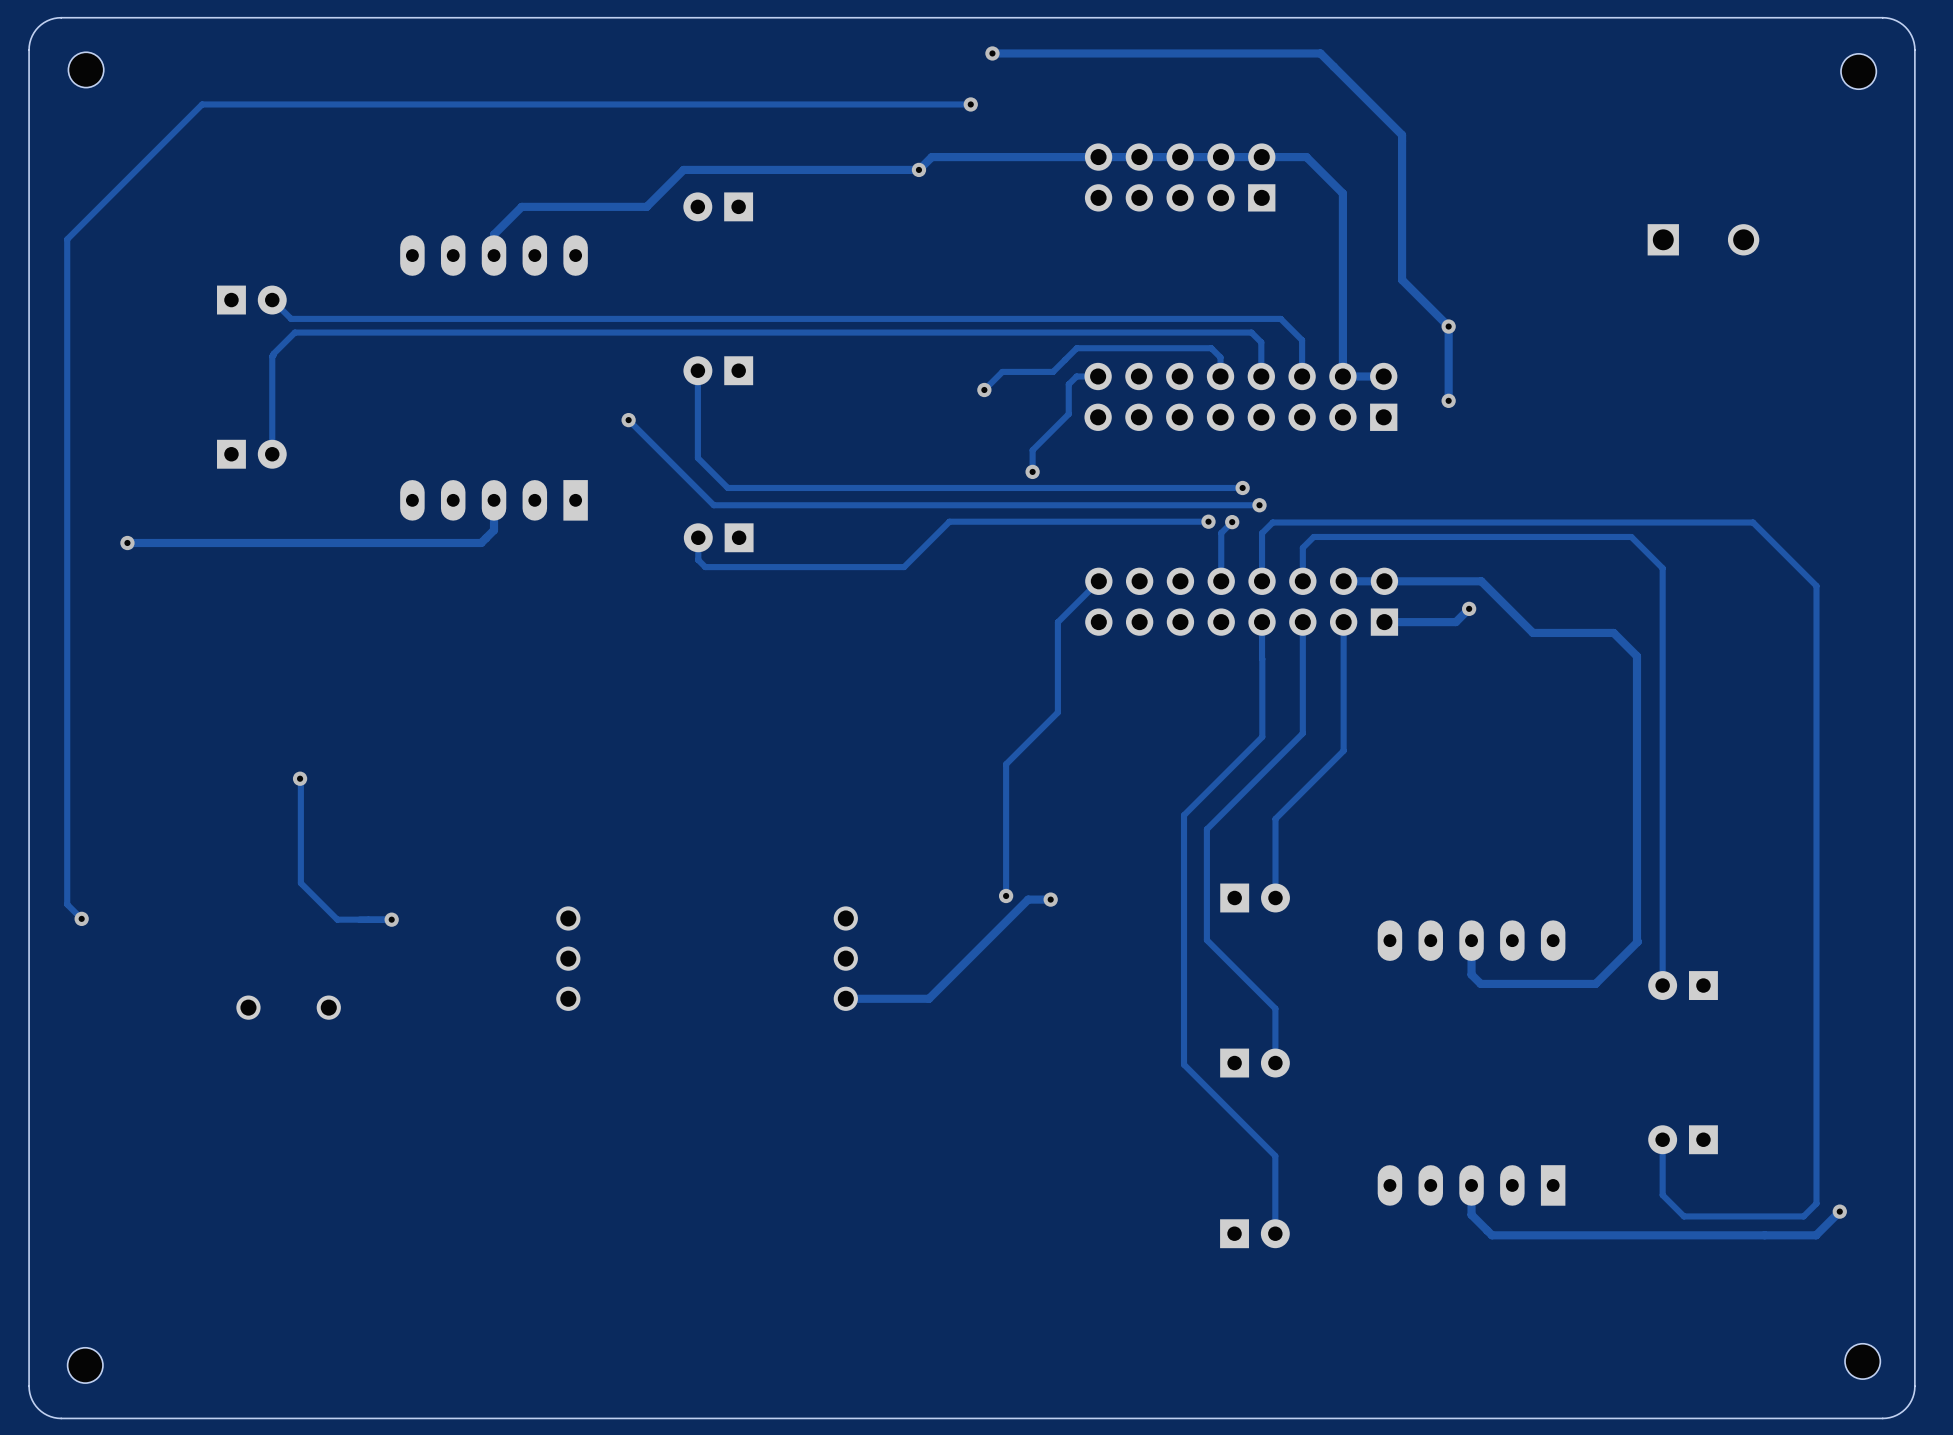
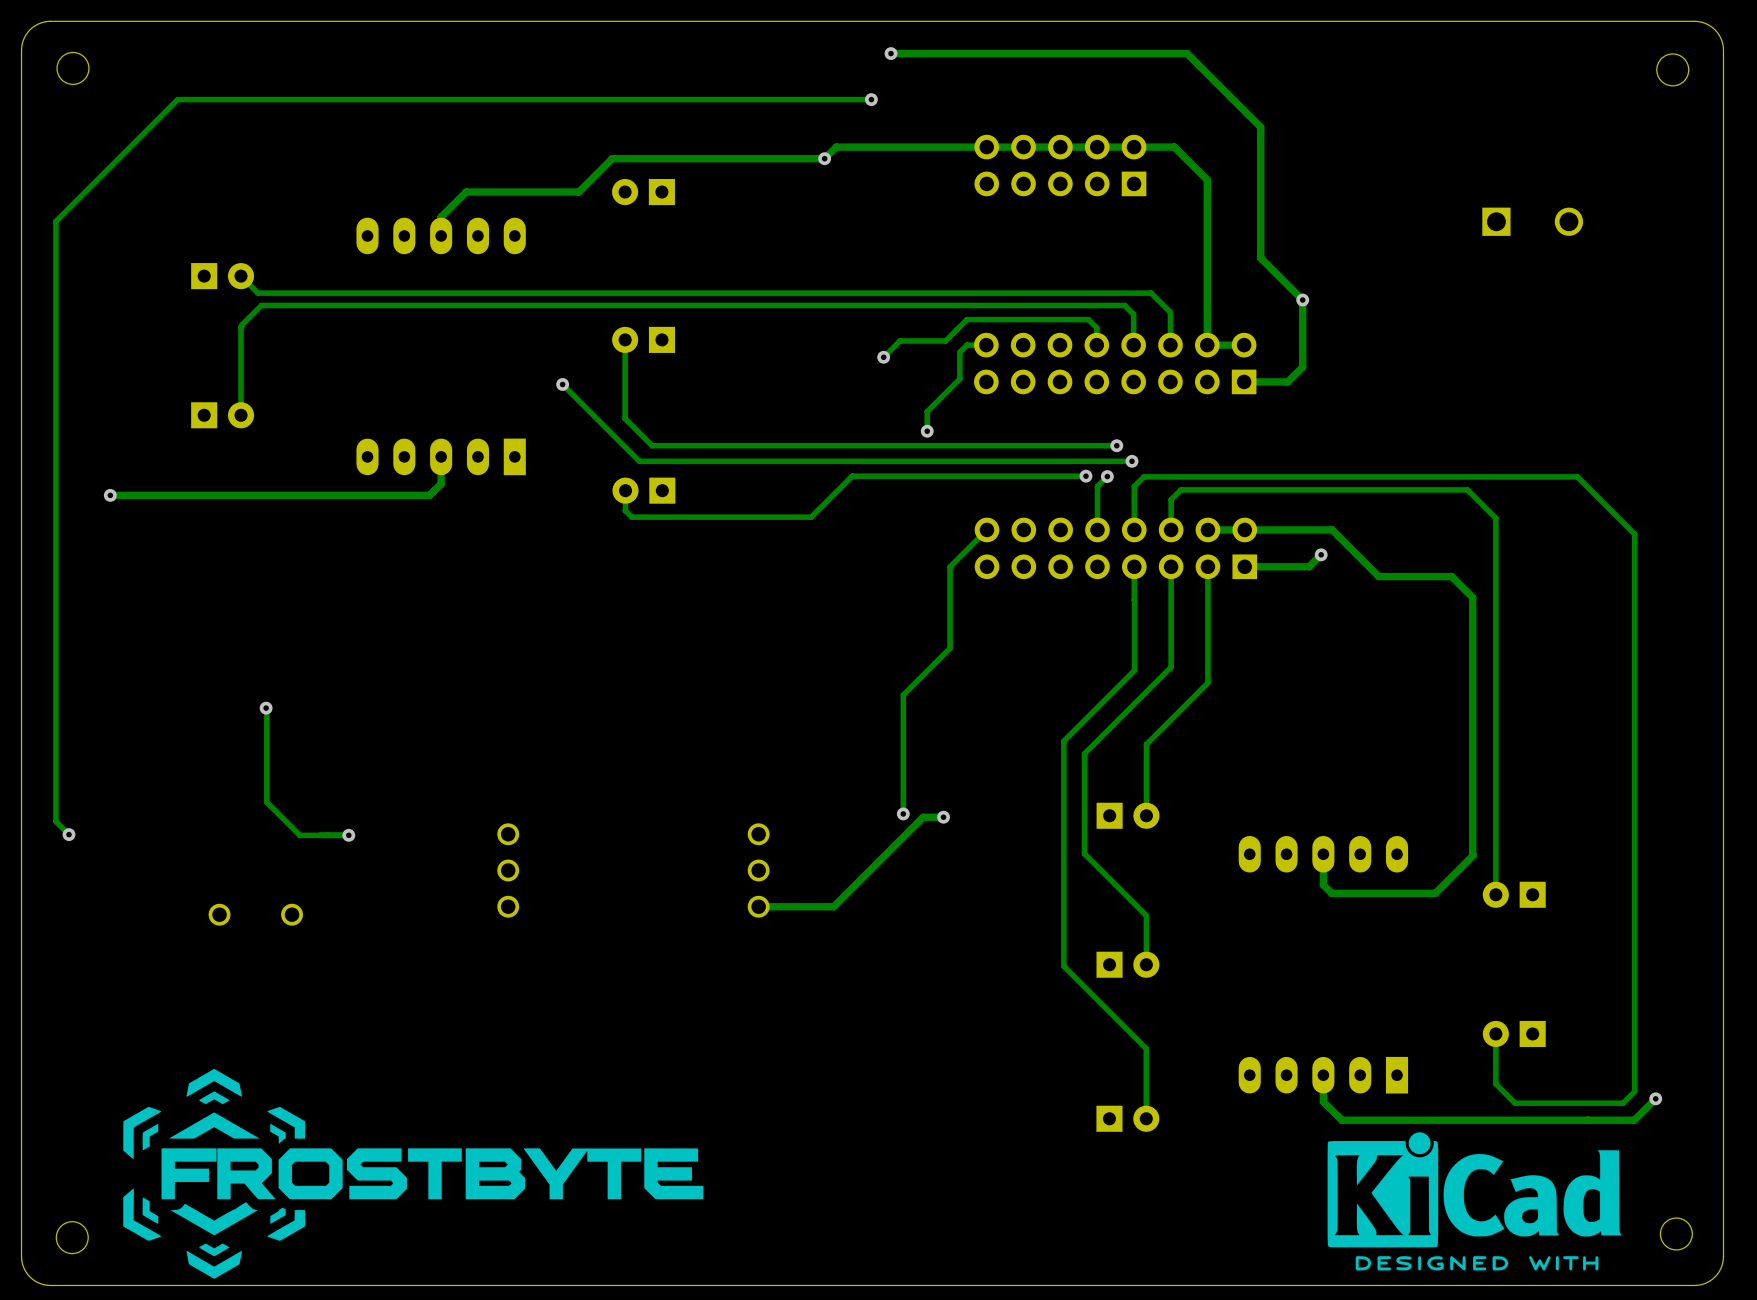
track: none -> (1302, 367) (1287, 381) (1244, 381)
via: (1448, 400) -> none
drawing: none -> [123, 1068, 704, 1279]
drawing: none -> [1327, 1132, 1622, 1271]

